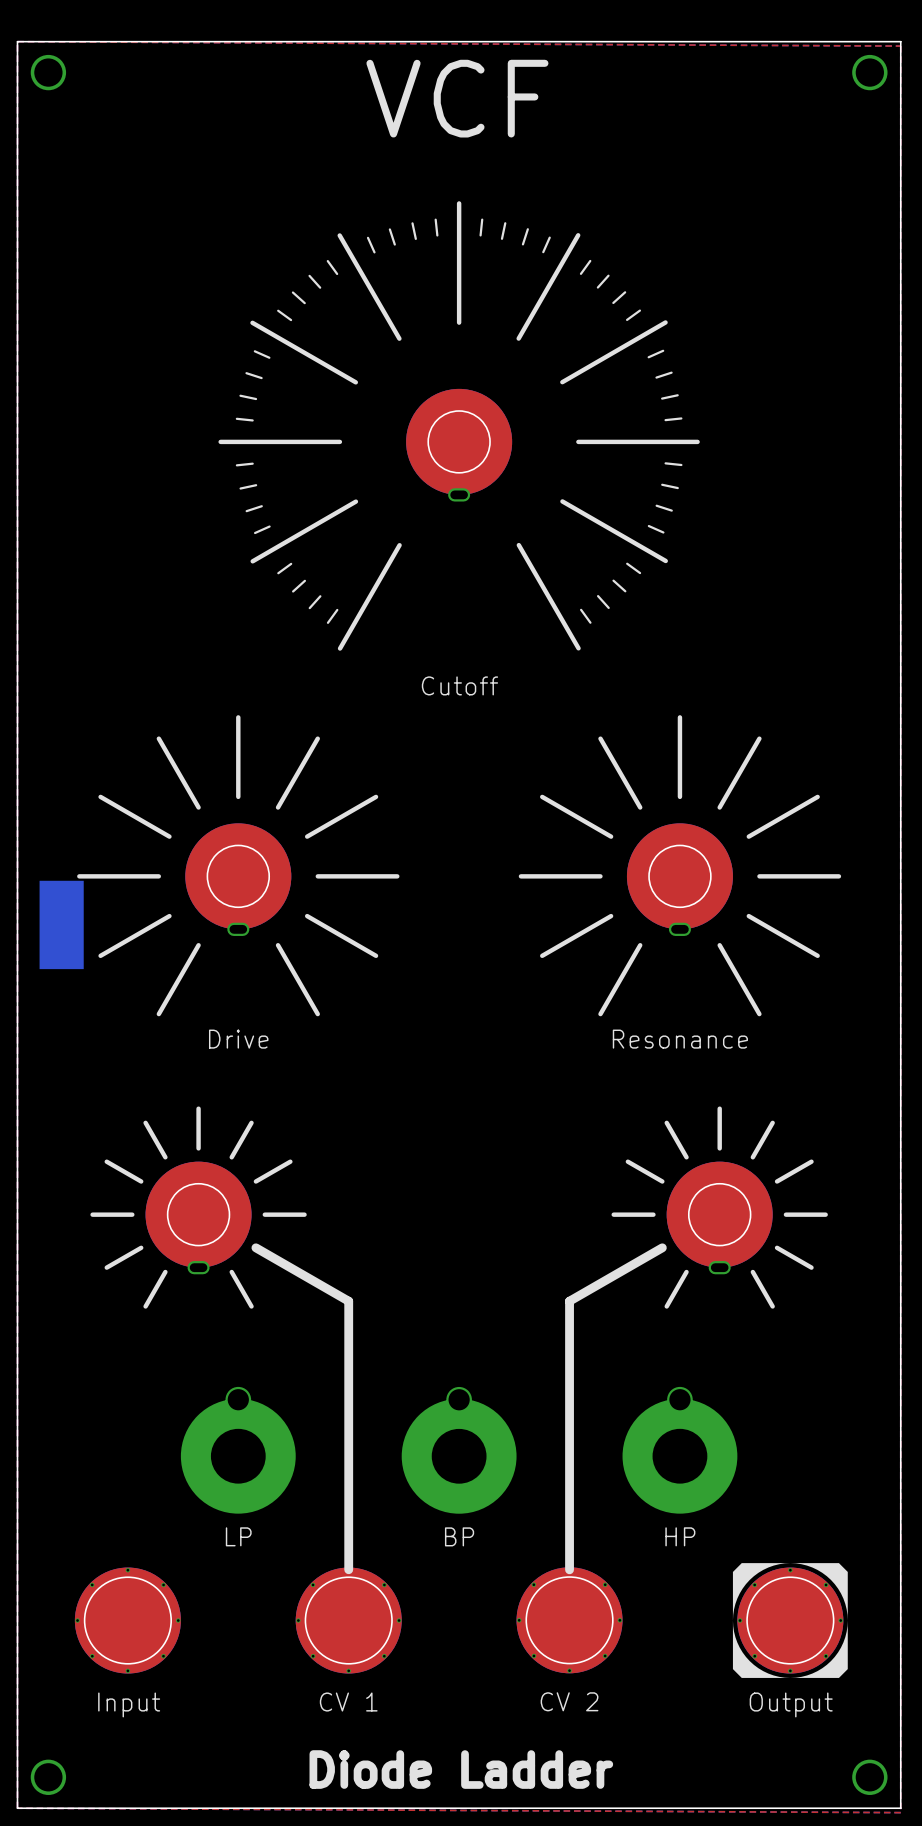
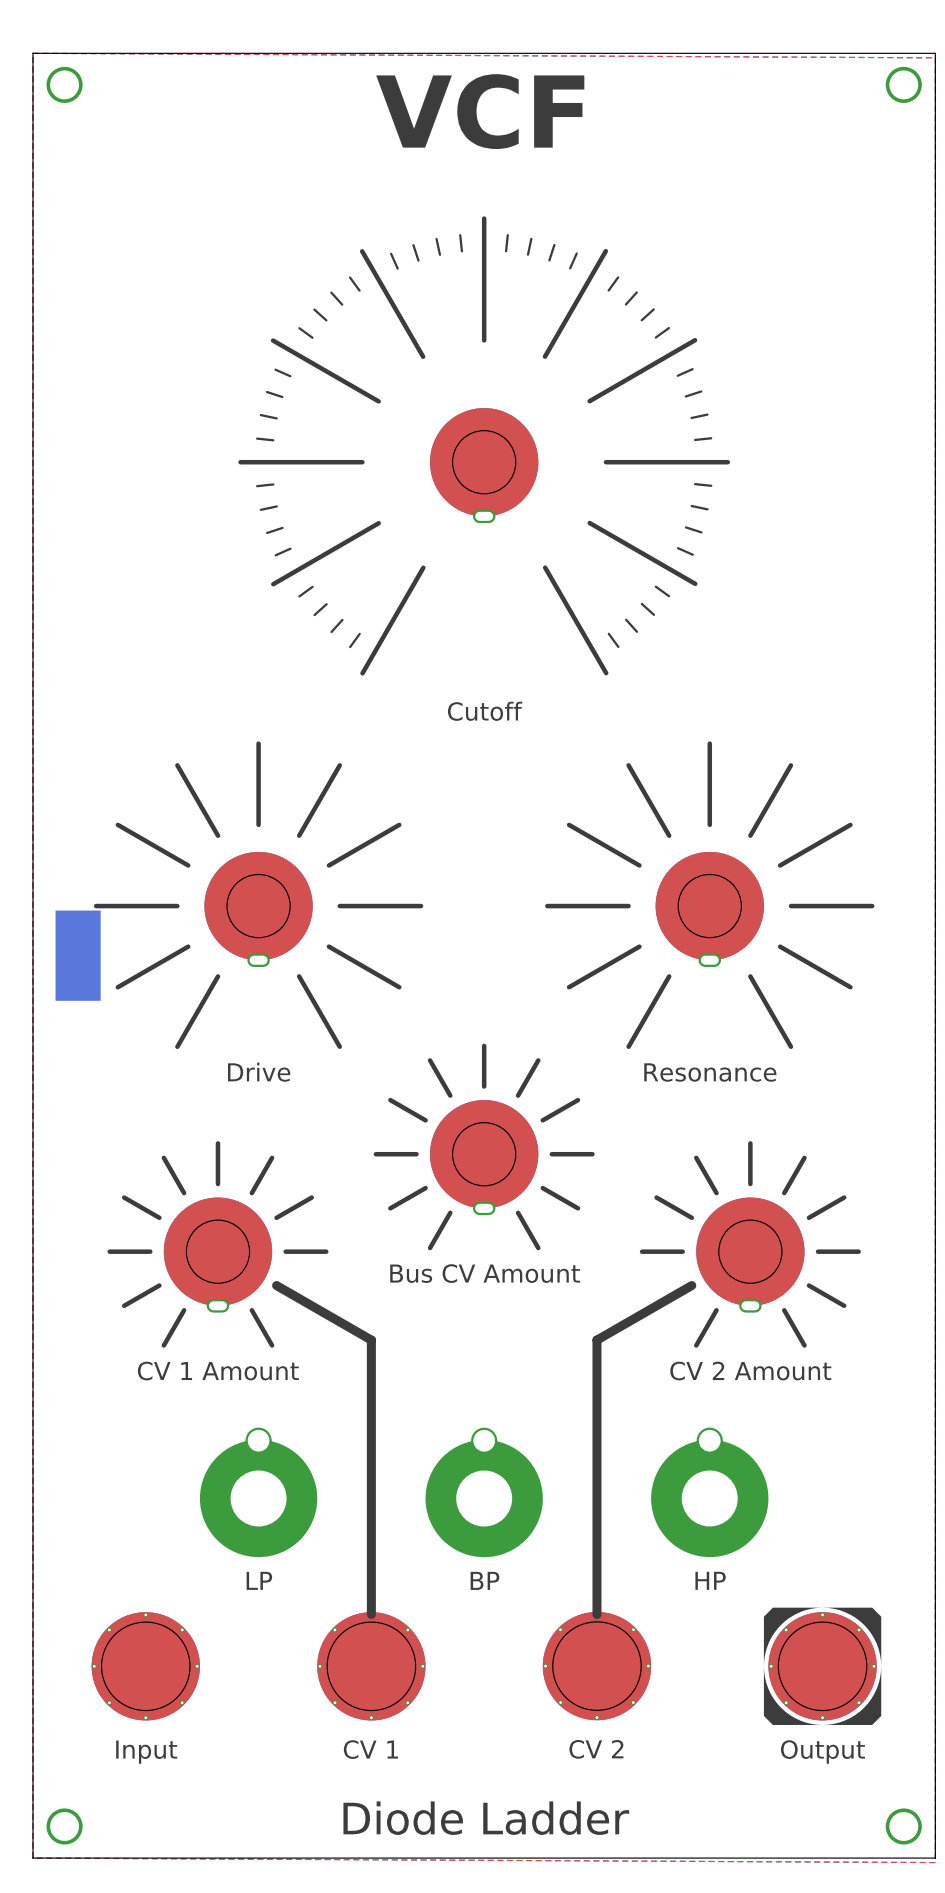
part: none -> Bus CV Amount (484, 1146)
part value: none -> CV 1 Amount (218, 1371)
part value: none -> CV 2 Amount (750, 1371)

